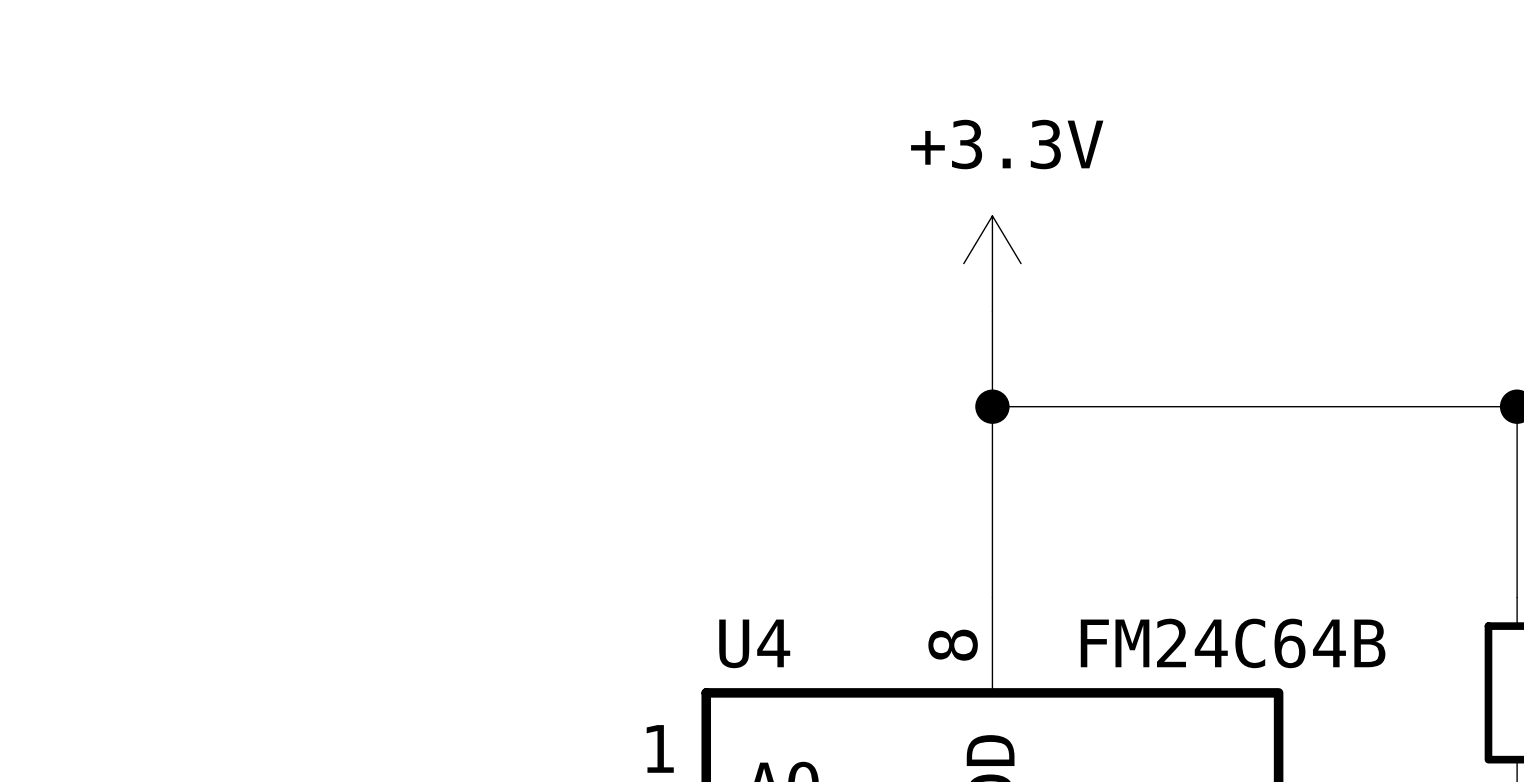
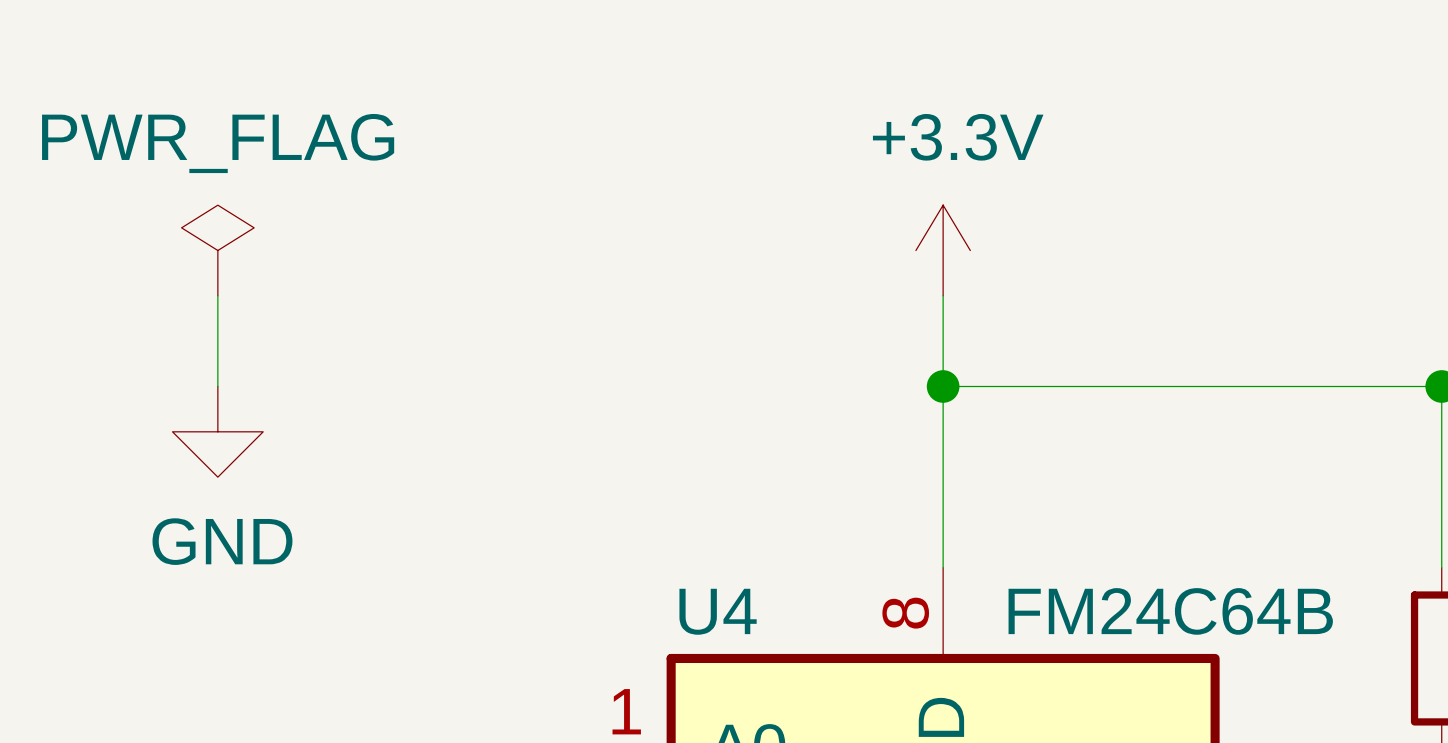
power symbol: none -> PWR_FLAG (217, 250)
wire: none -> (217, 295) (217, 386)
power symbol: none -> GND (217, 431)

